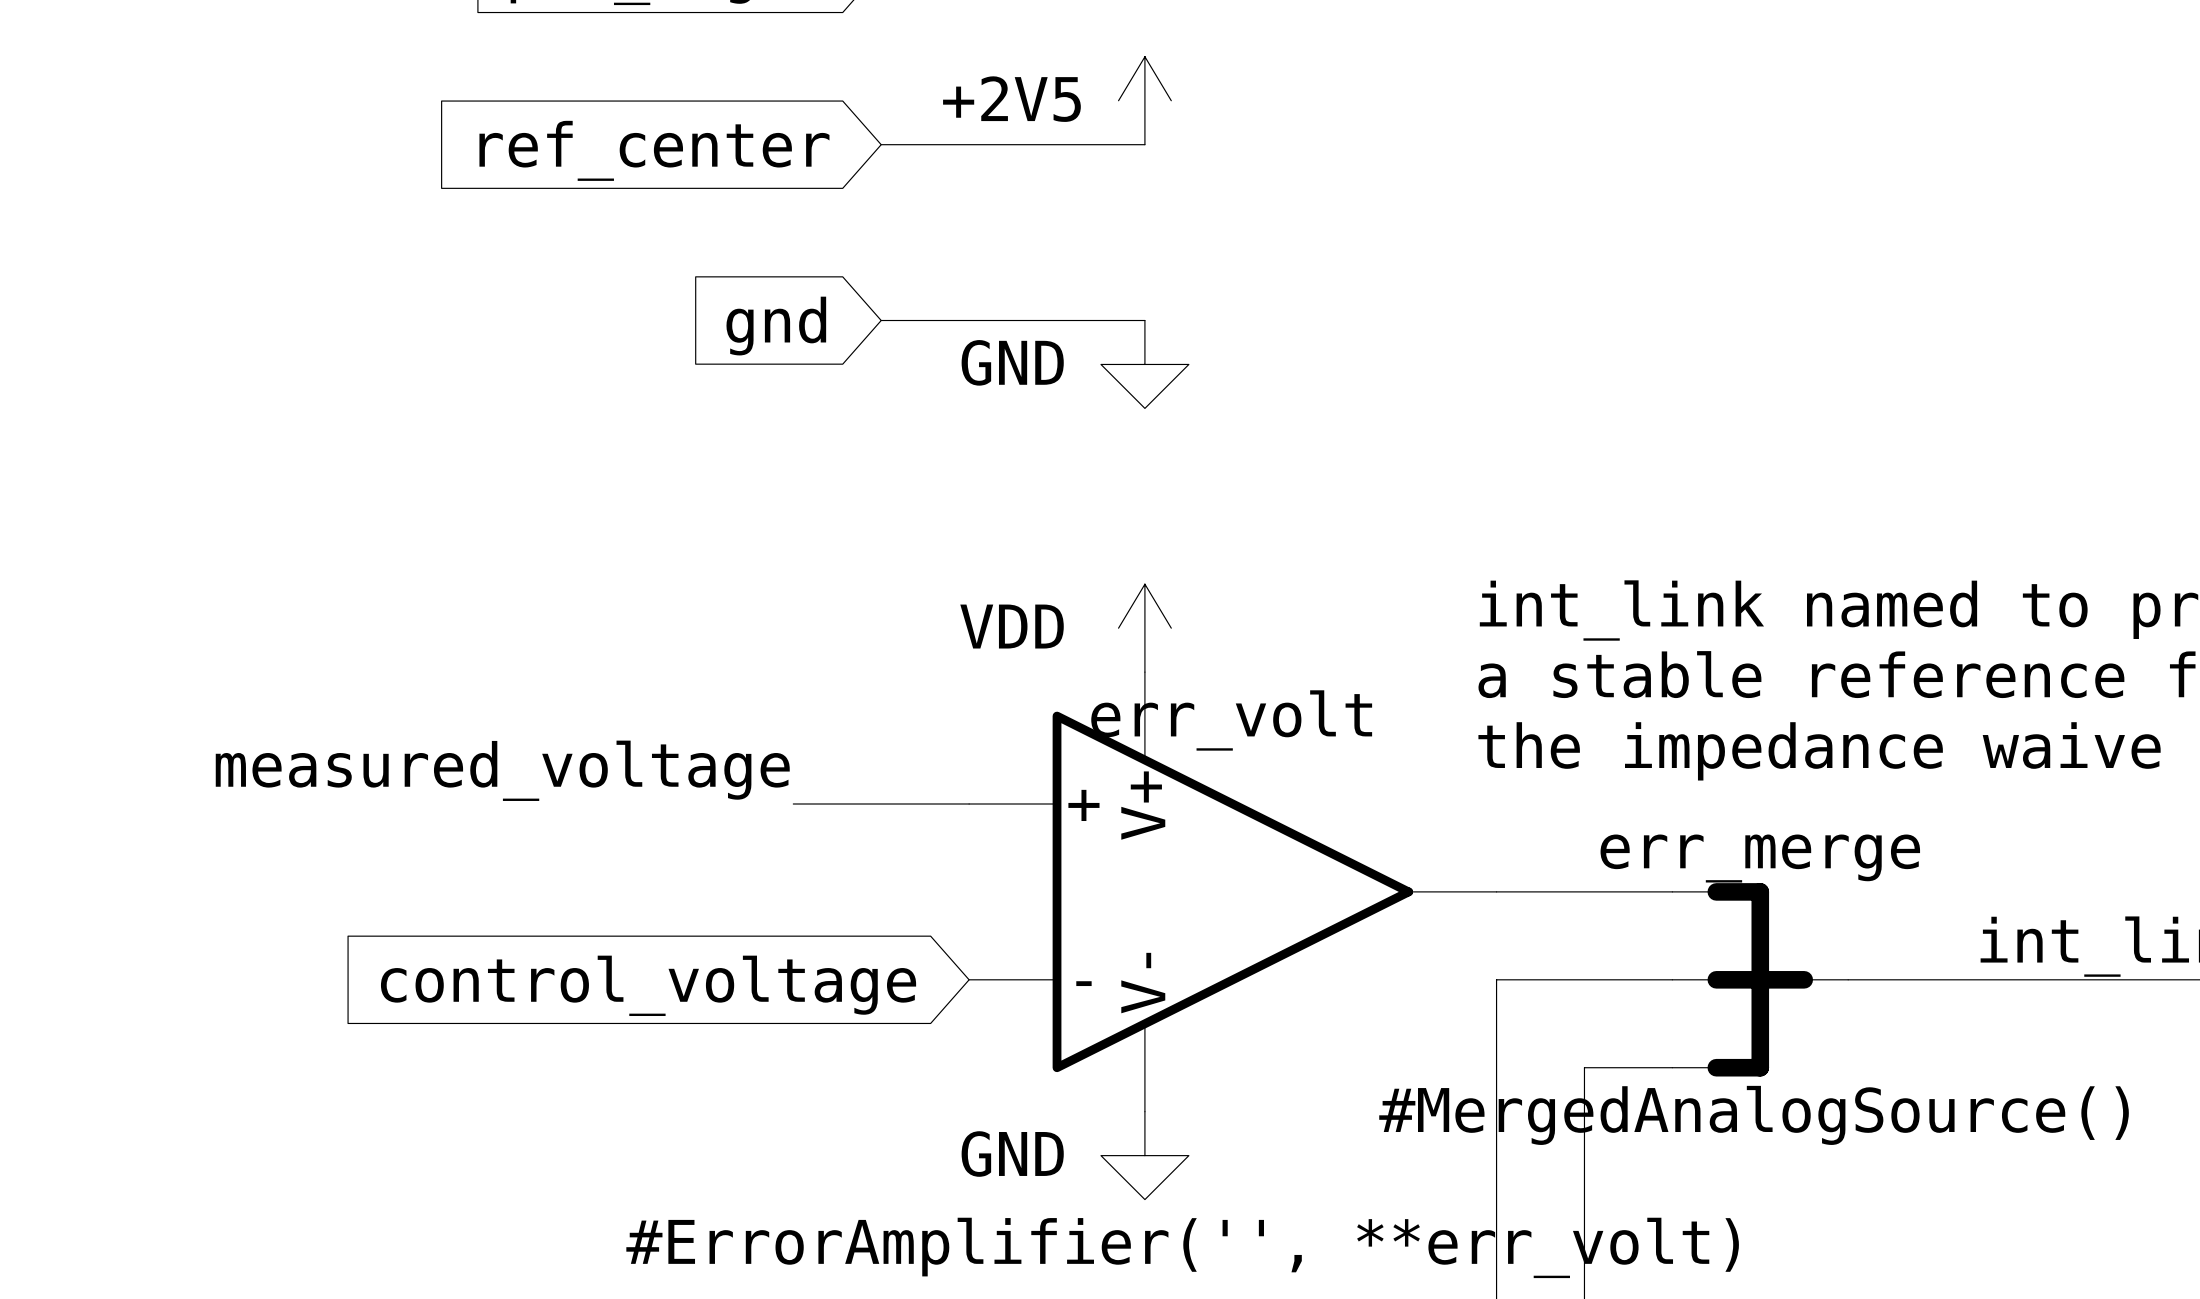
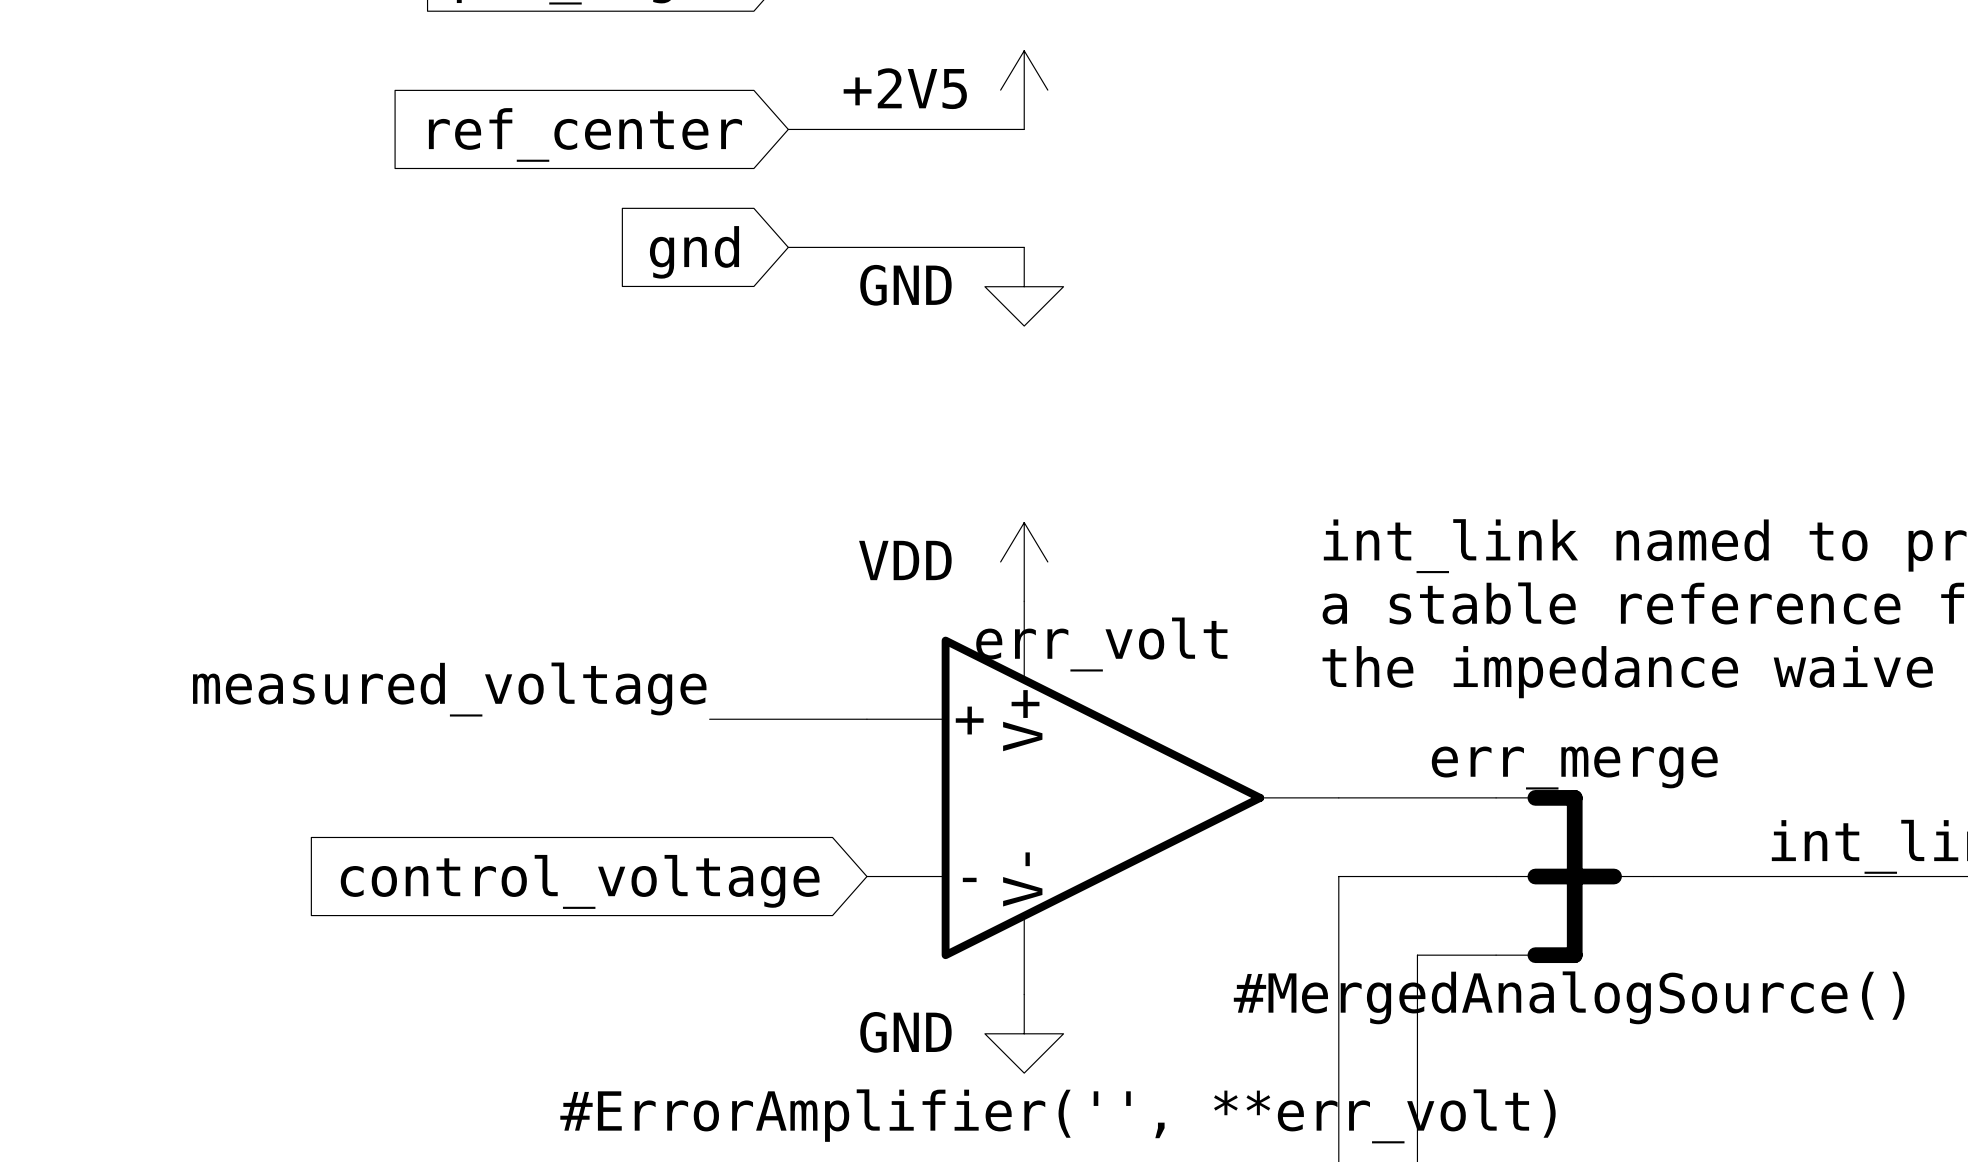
wire: (881, 320) (1144, 320) -> (788, 247) (1024, 247)
global label position: gnd (776, 326) -> gnd (694, 252)
power symbol position: GND (1144, 364) -> GND (1024, 286)

